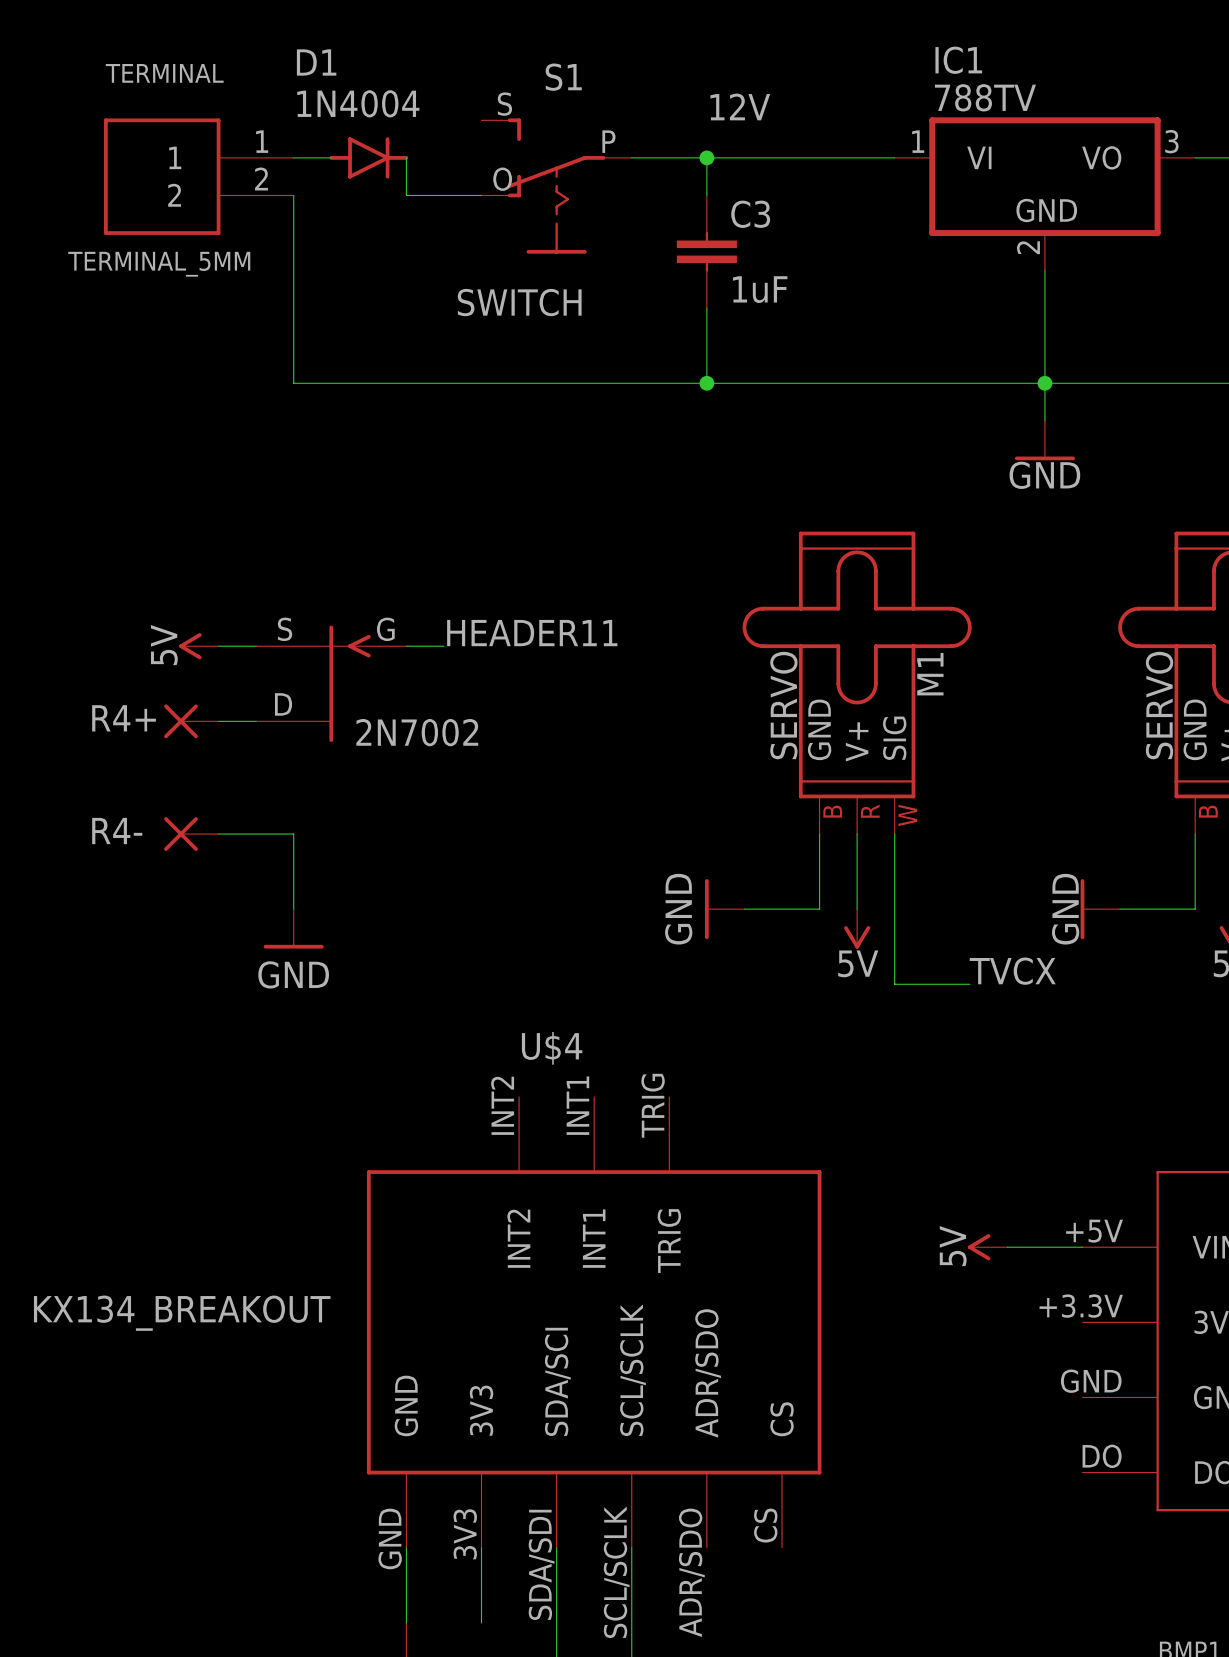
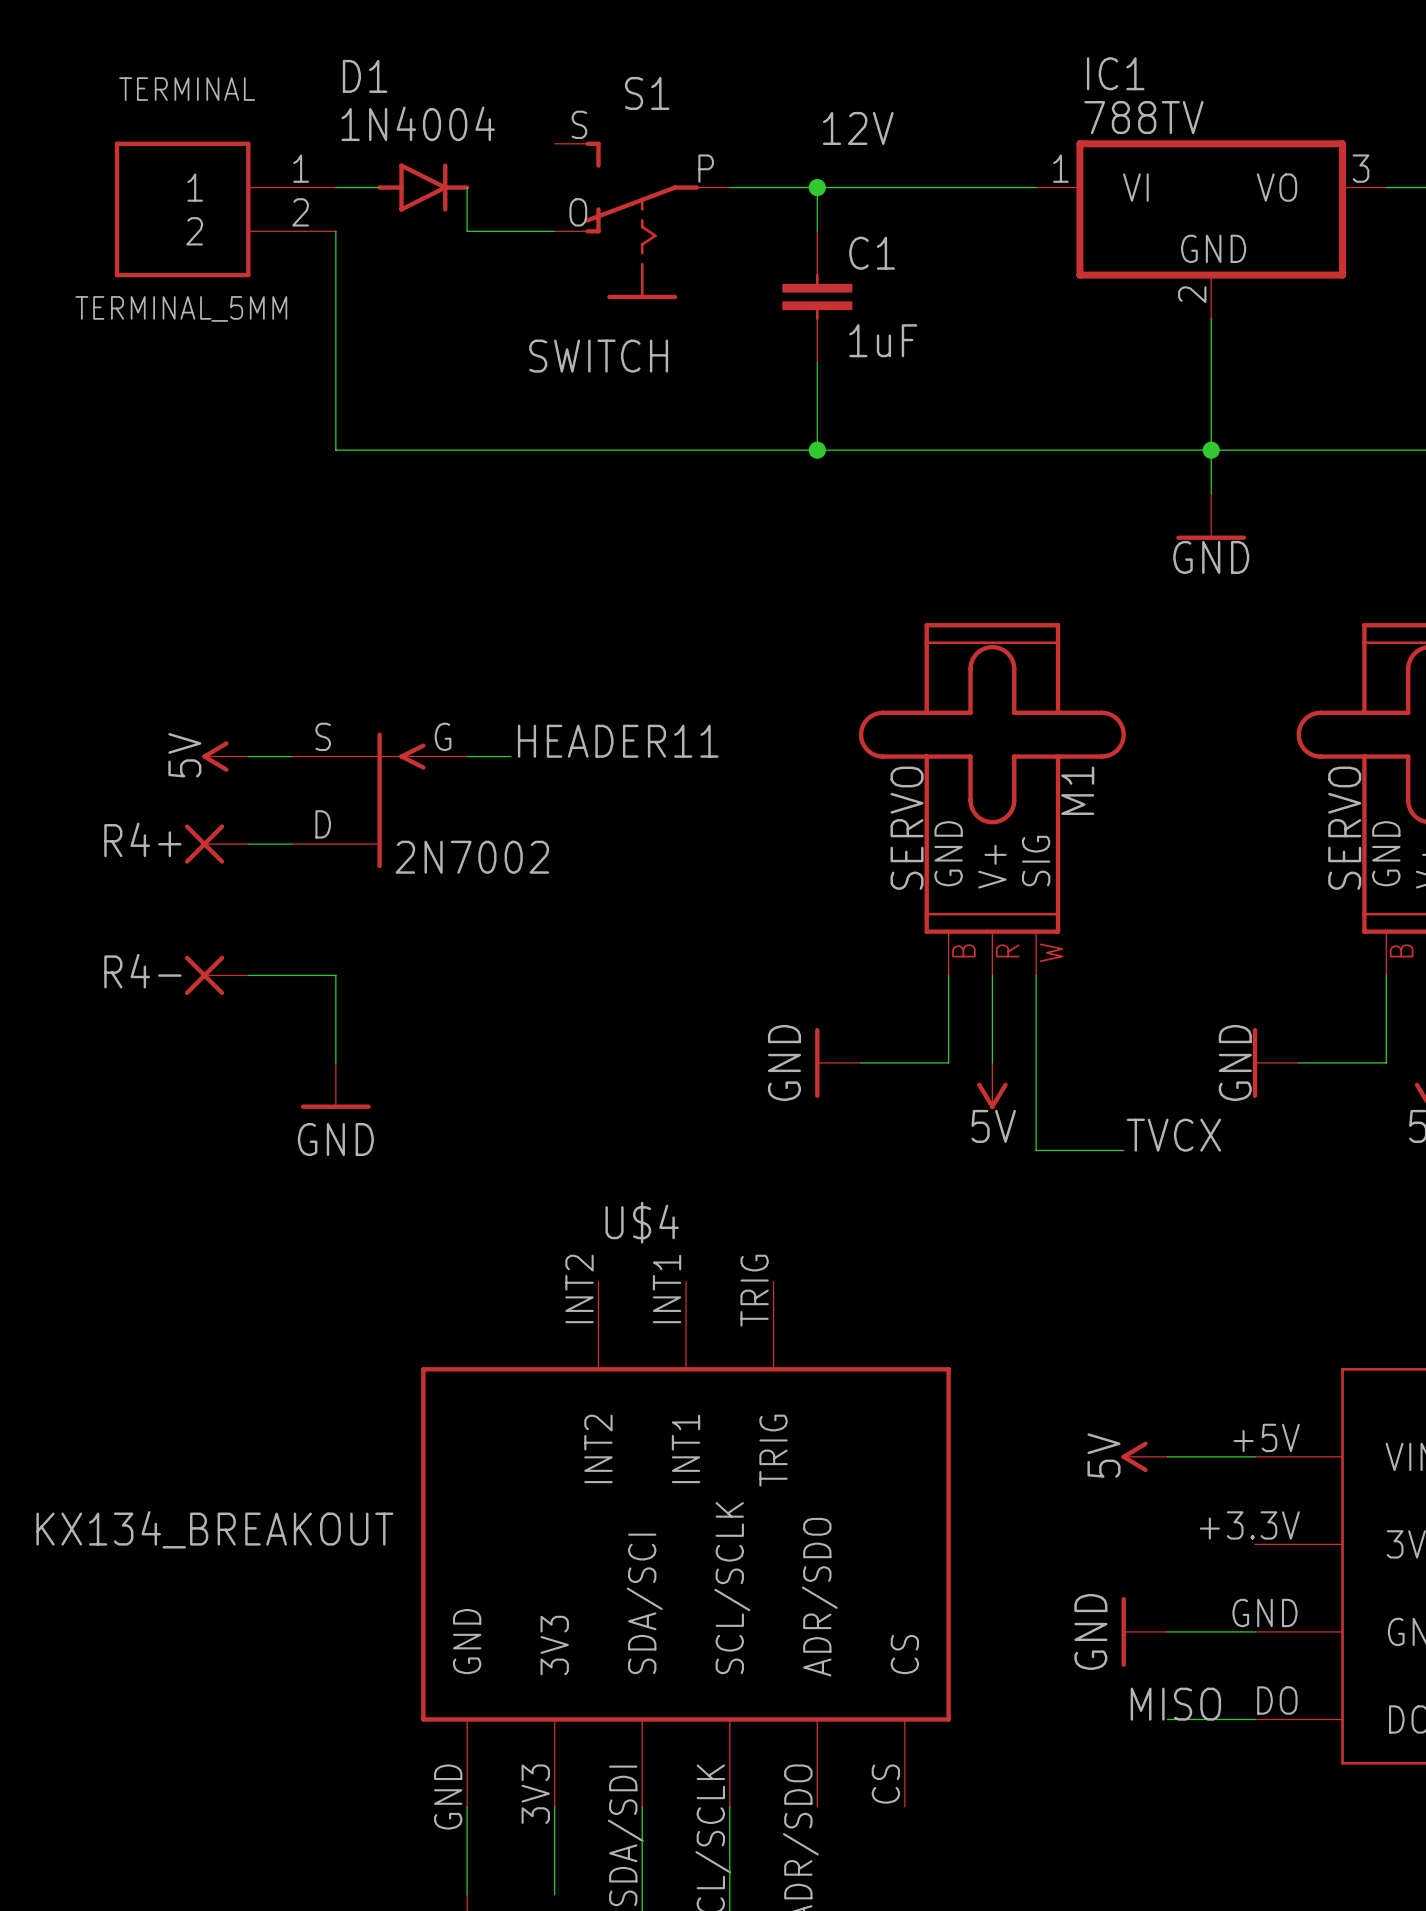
C3 name: C3 (750, 214) -> C1 (872, 253)
power symbol: none -> GND (1144, 1631)
wire: none -> (1167, 1631) (1255, 1631)
label: none -> MISO (1175, 1704)
wire: none -> (1167, 1719) (1255, 1719)

